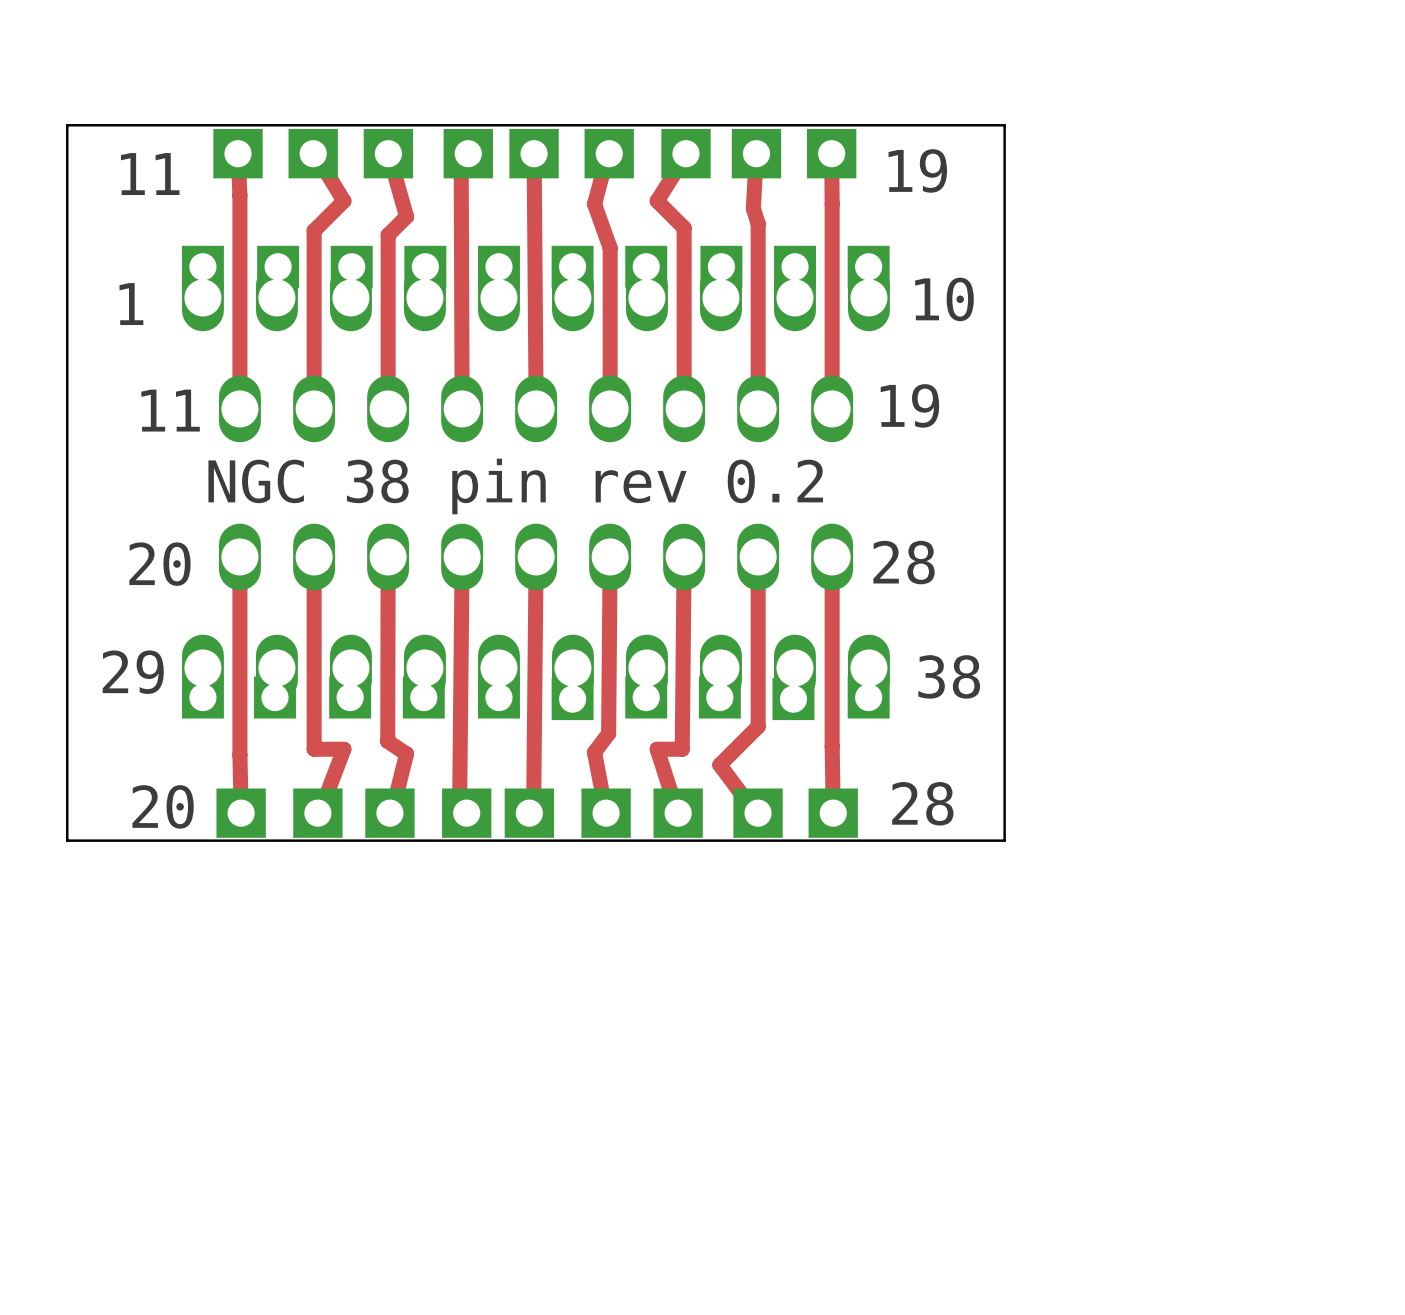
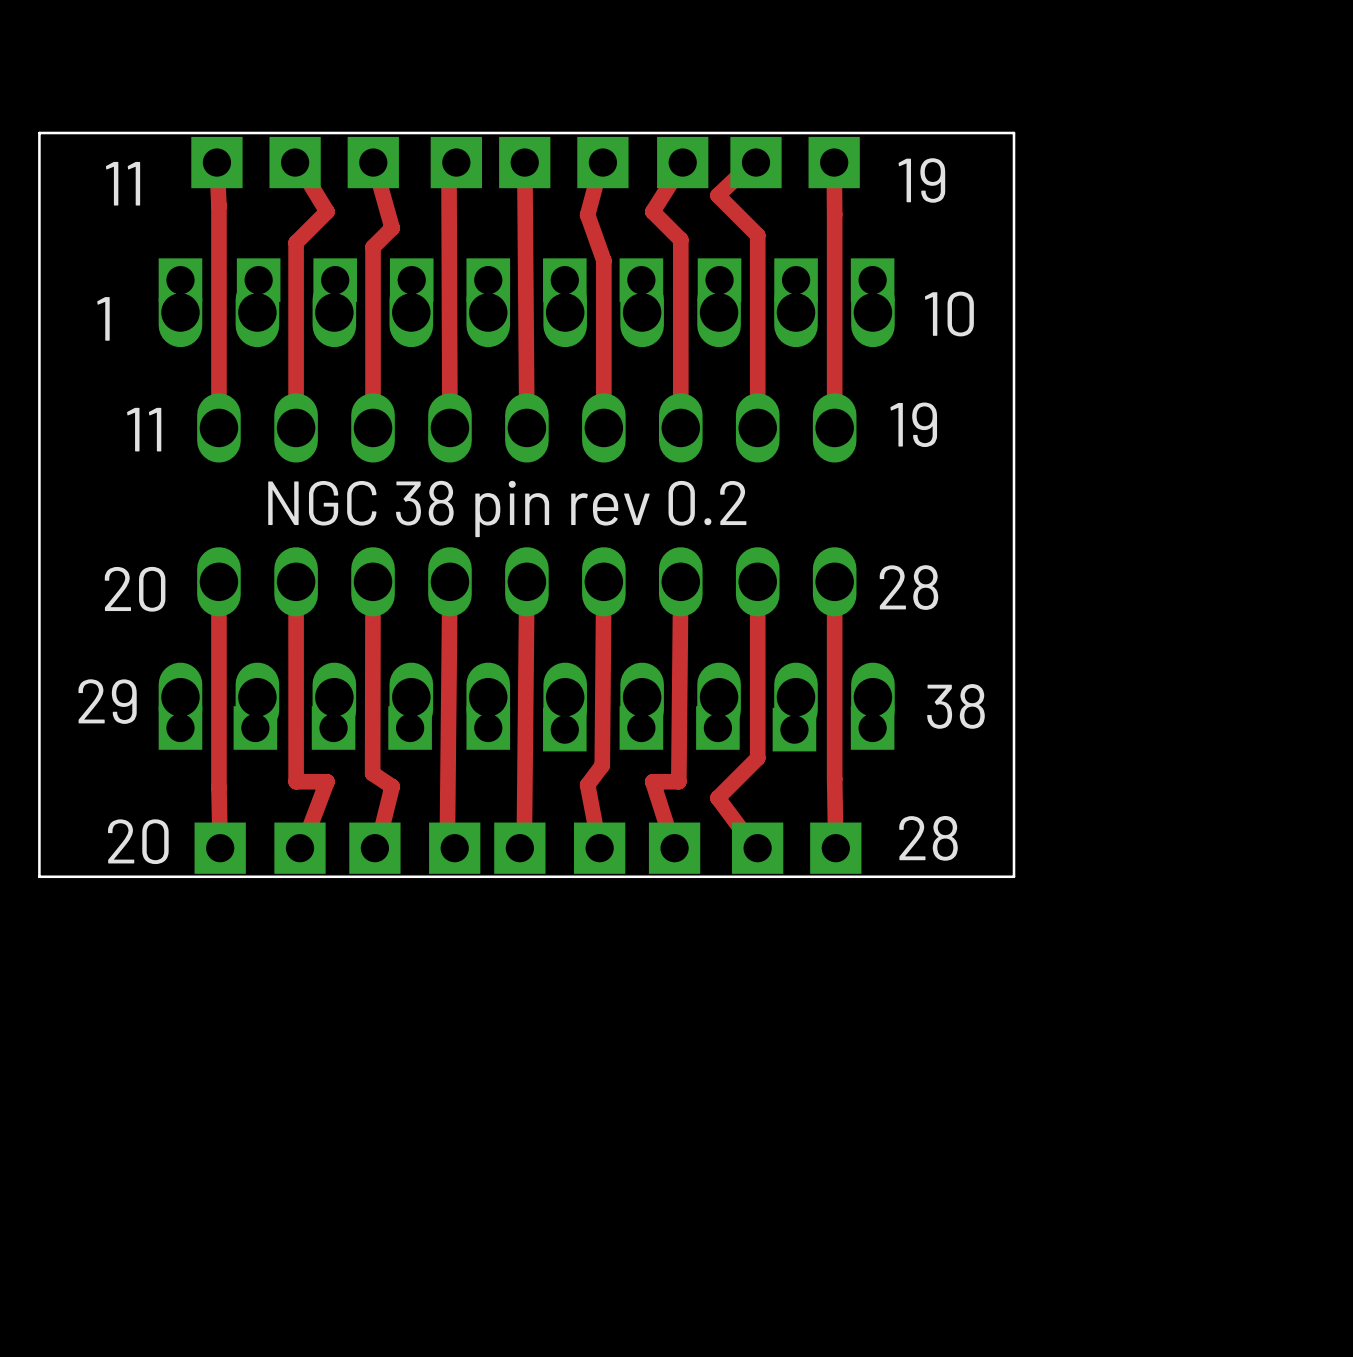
track: (756, 150) (753, 208) (758, 223) -> (756, 159) (717, 195) (757, 235)

